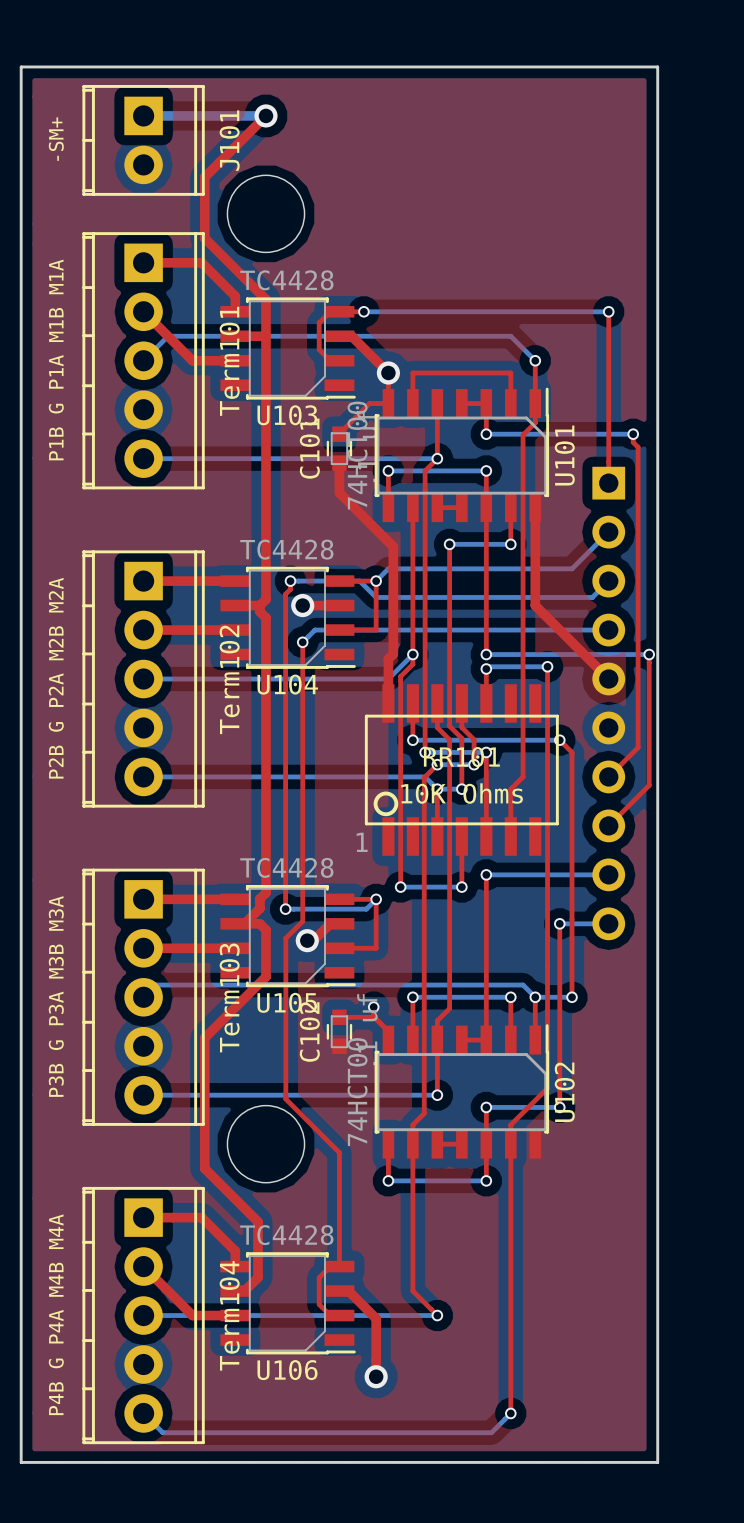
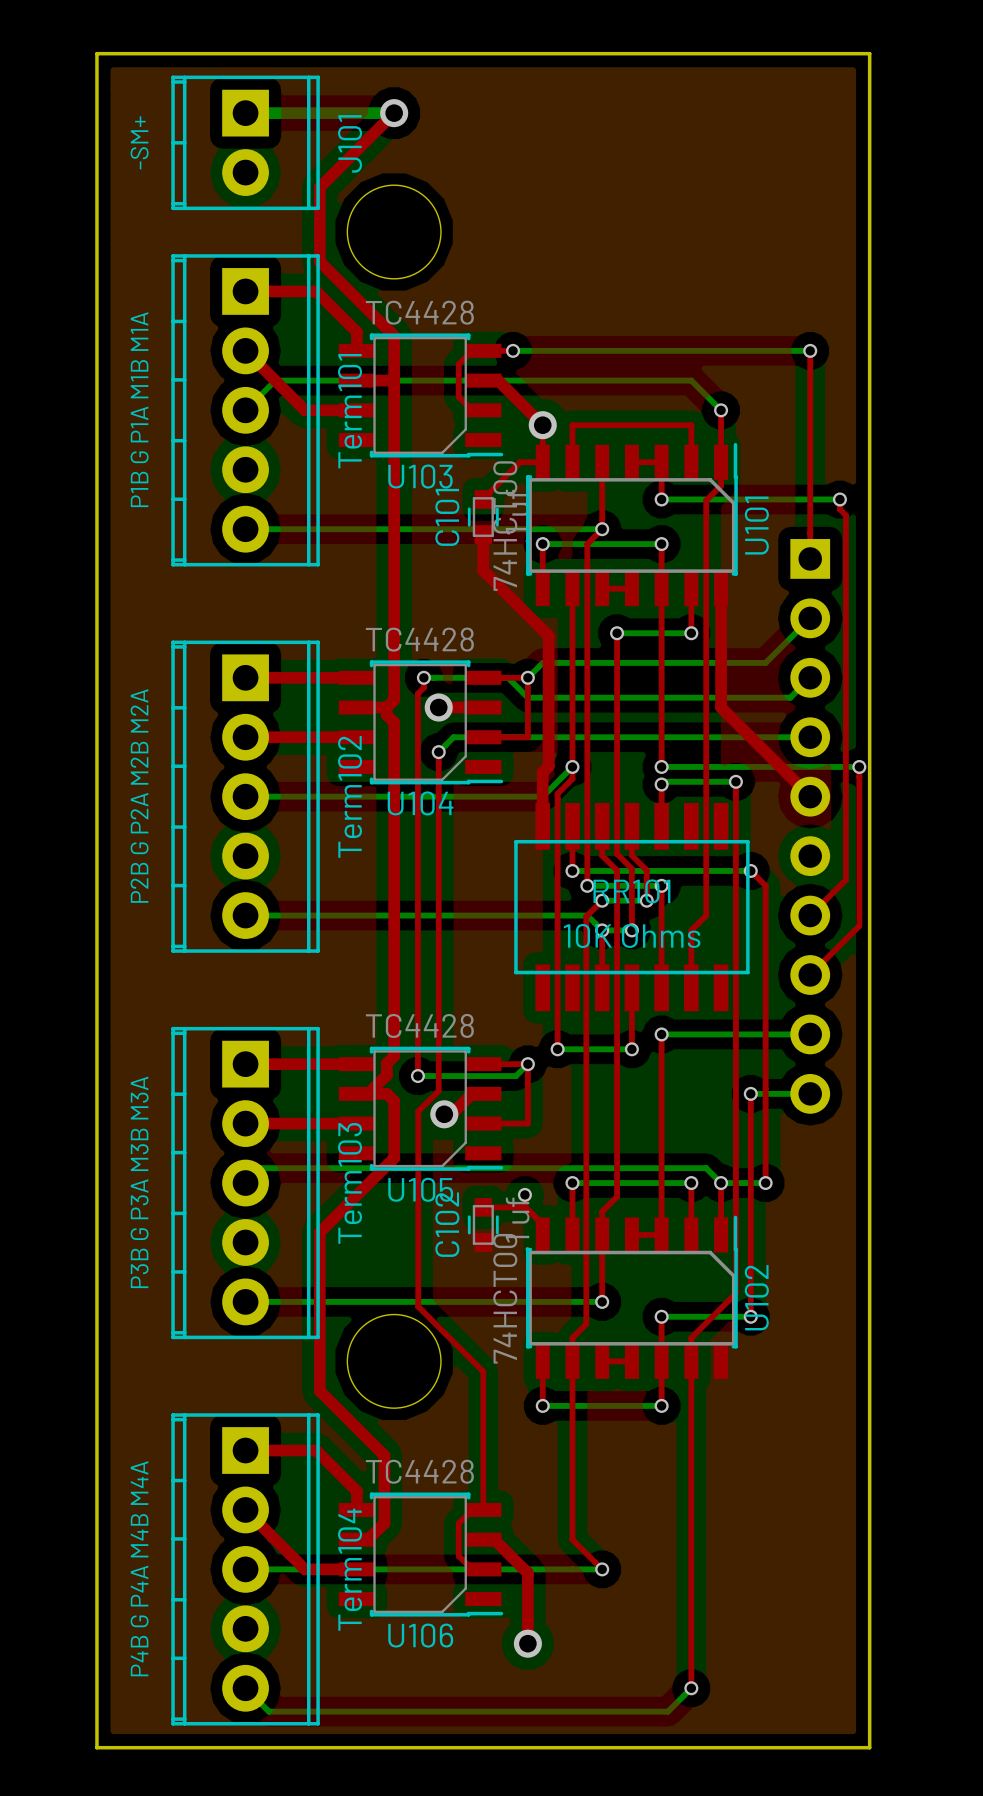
drawing: [373, 791, 399, 817] -> none
text: 1 (362, 842) -> none

